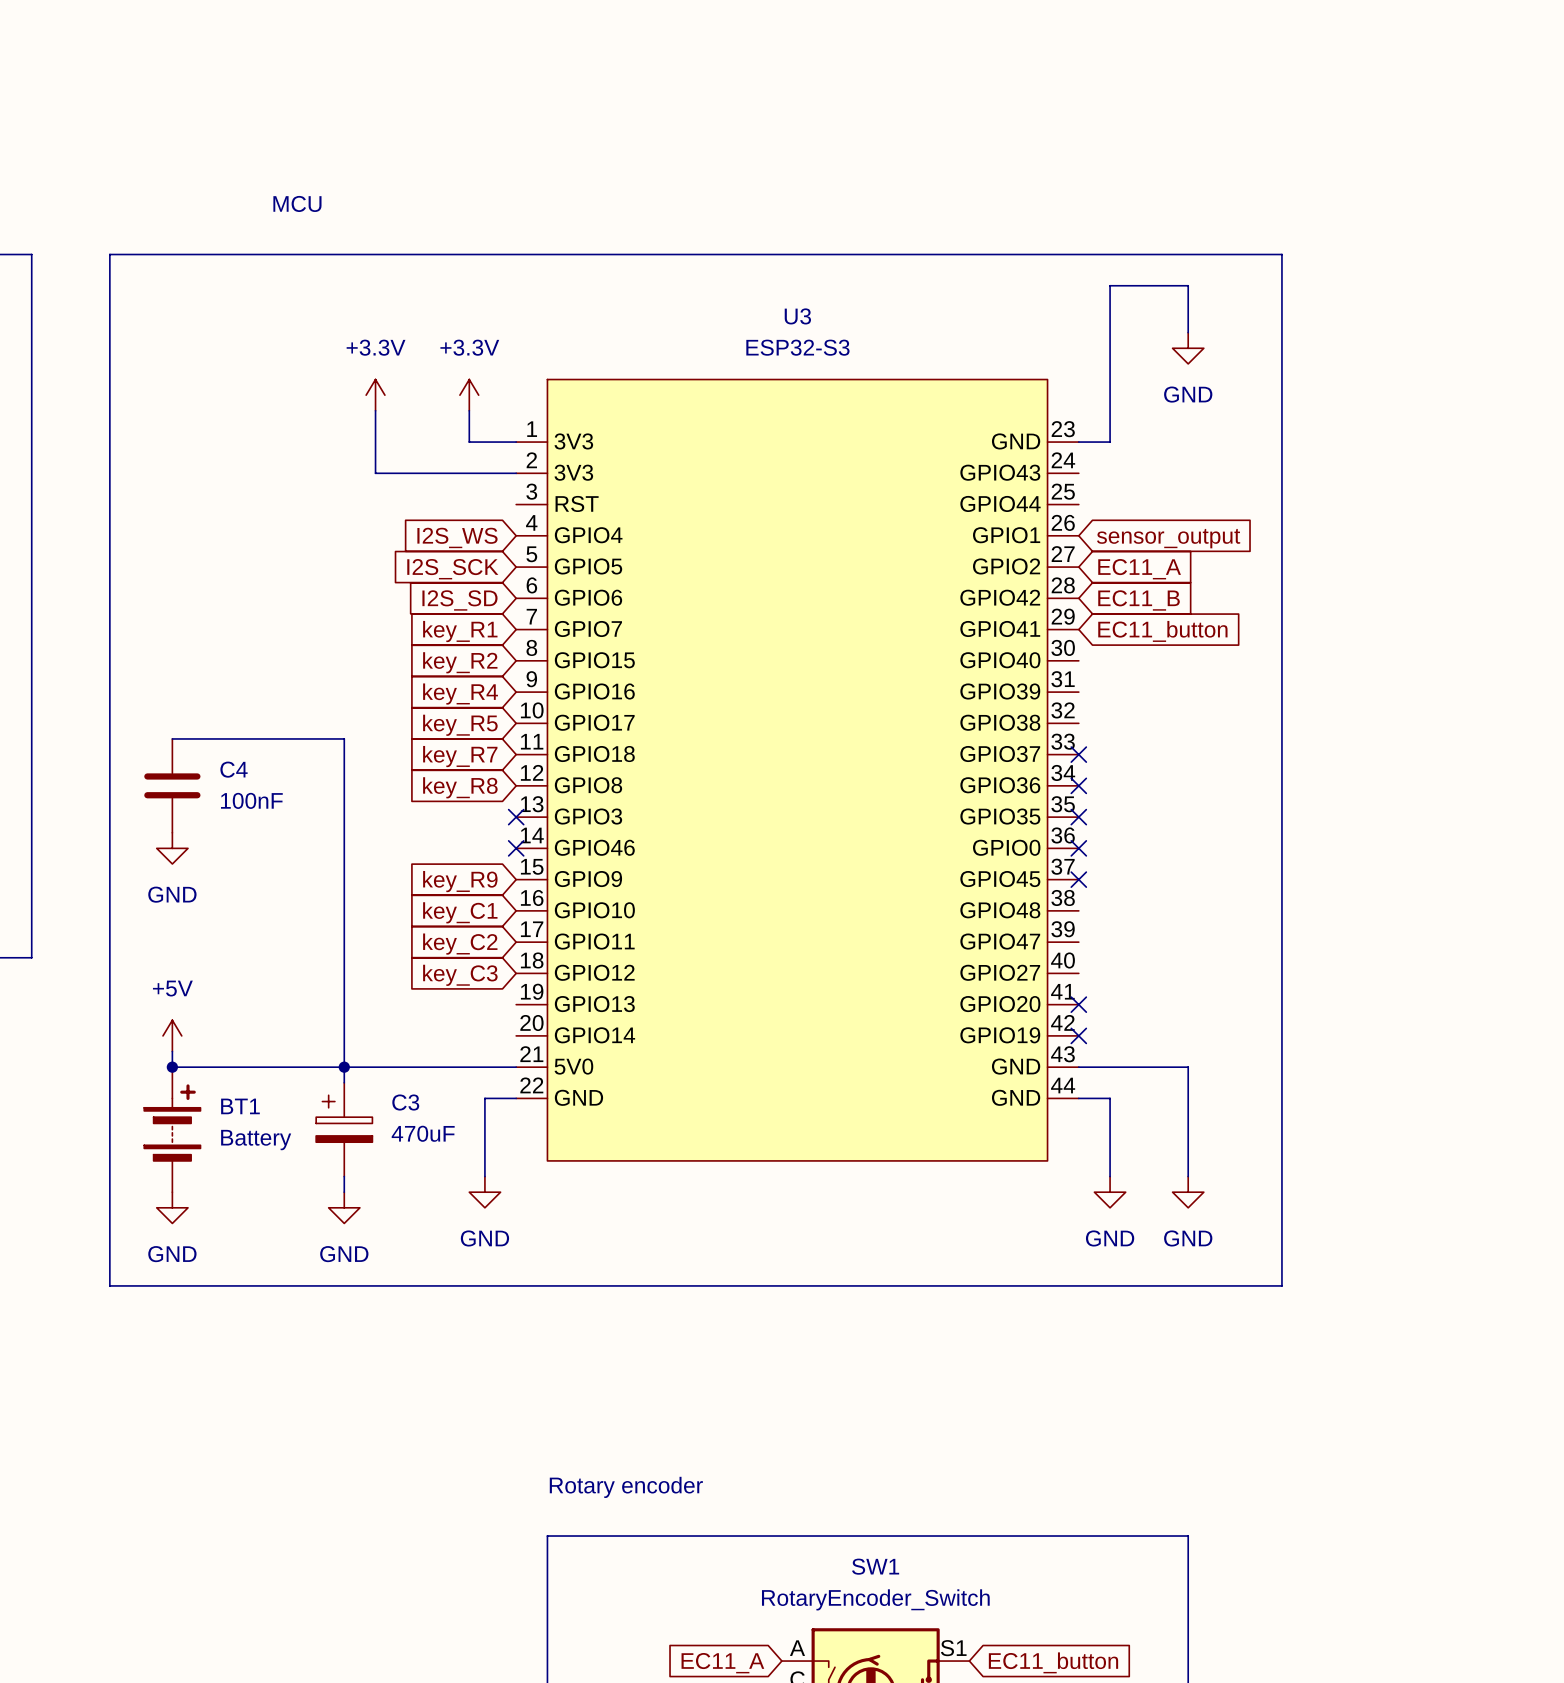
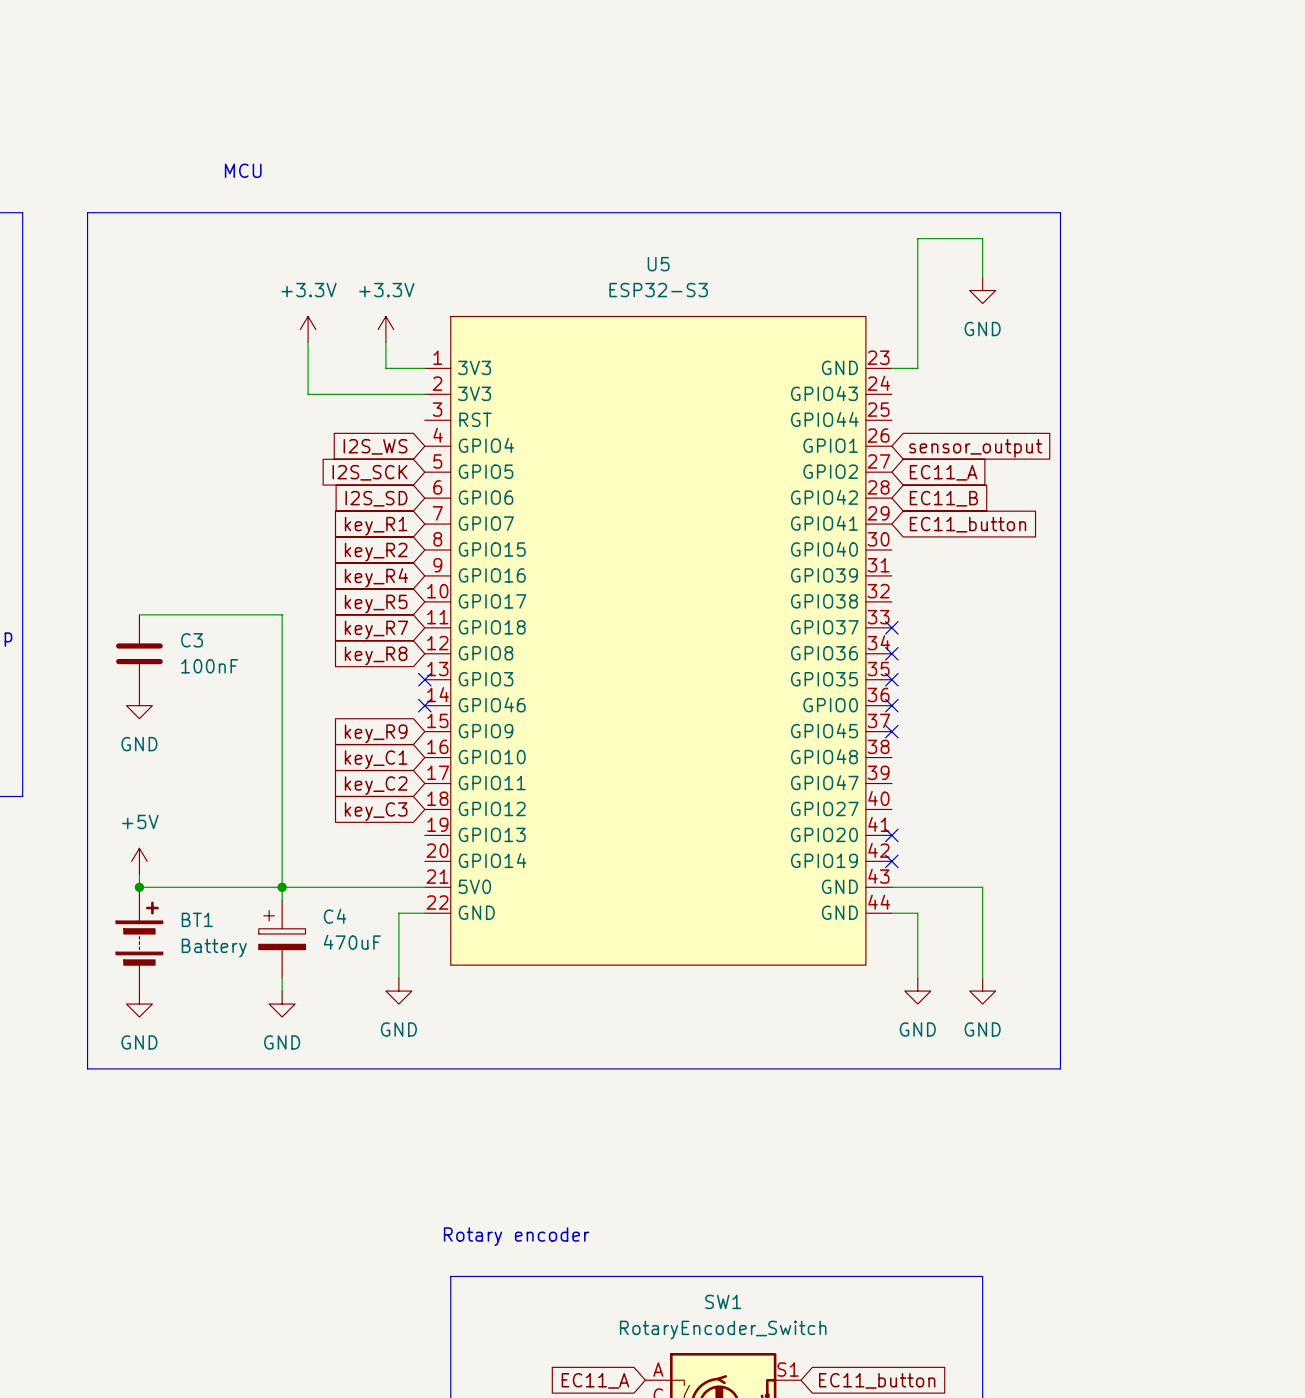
U3 name: U3 (797, 316) -> U5 (658, 264)
C4 name: C4 (234, 769) -> C3 (192, 640)
C3 name: C3 (405, 1102) -> C4 (335, 916)

